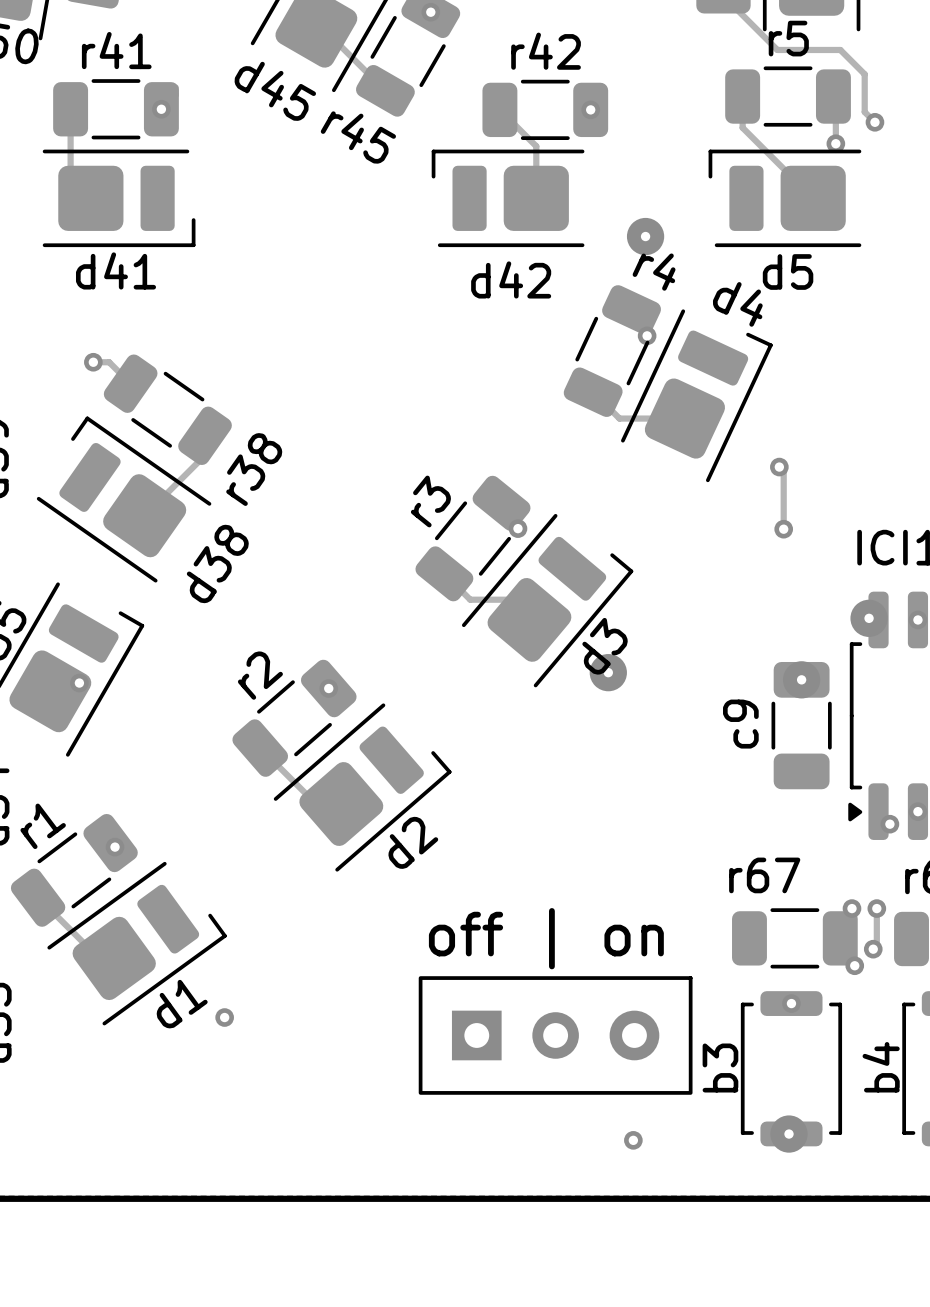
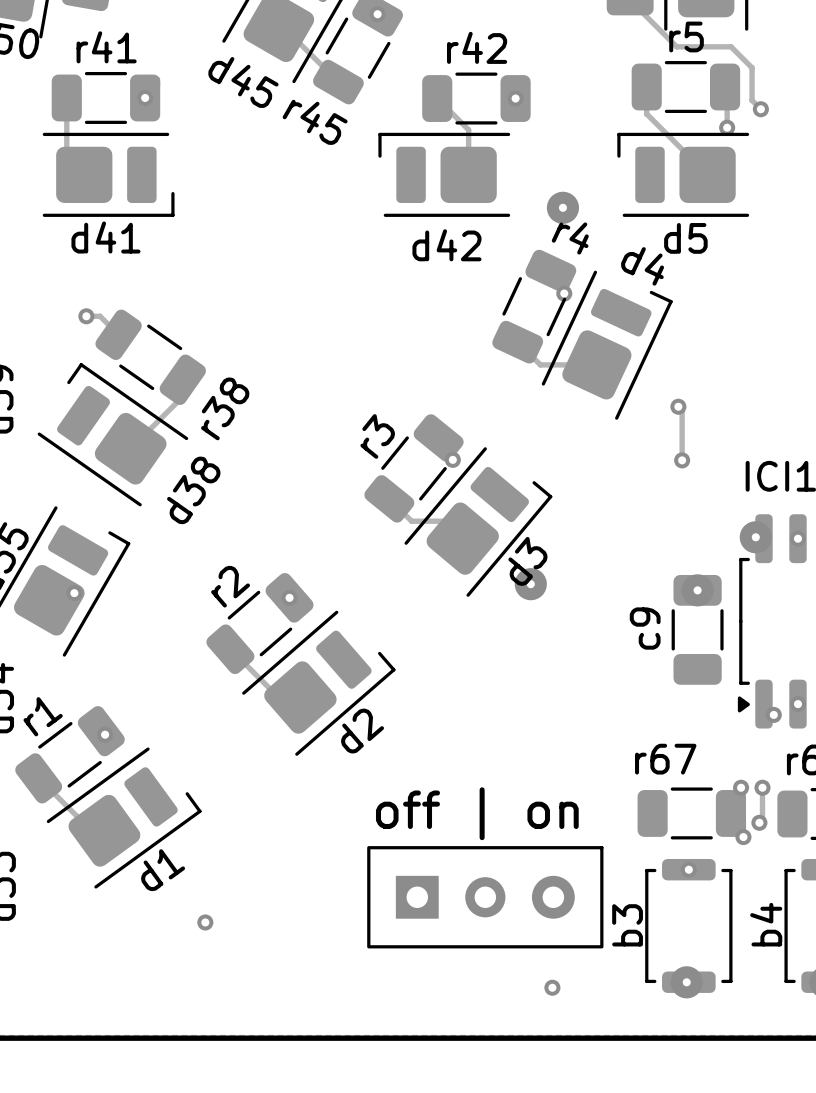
via position: (224, 1017) -> (205, 922)

